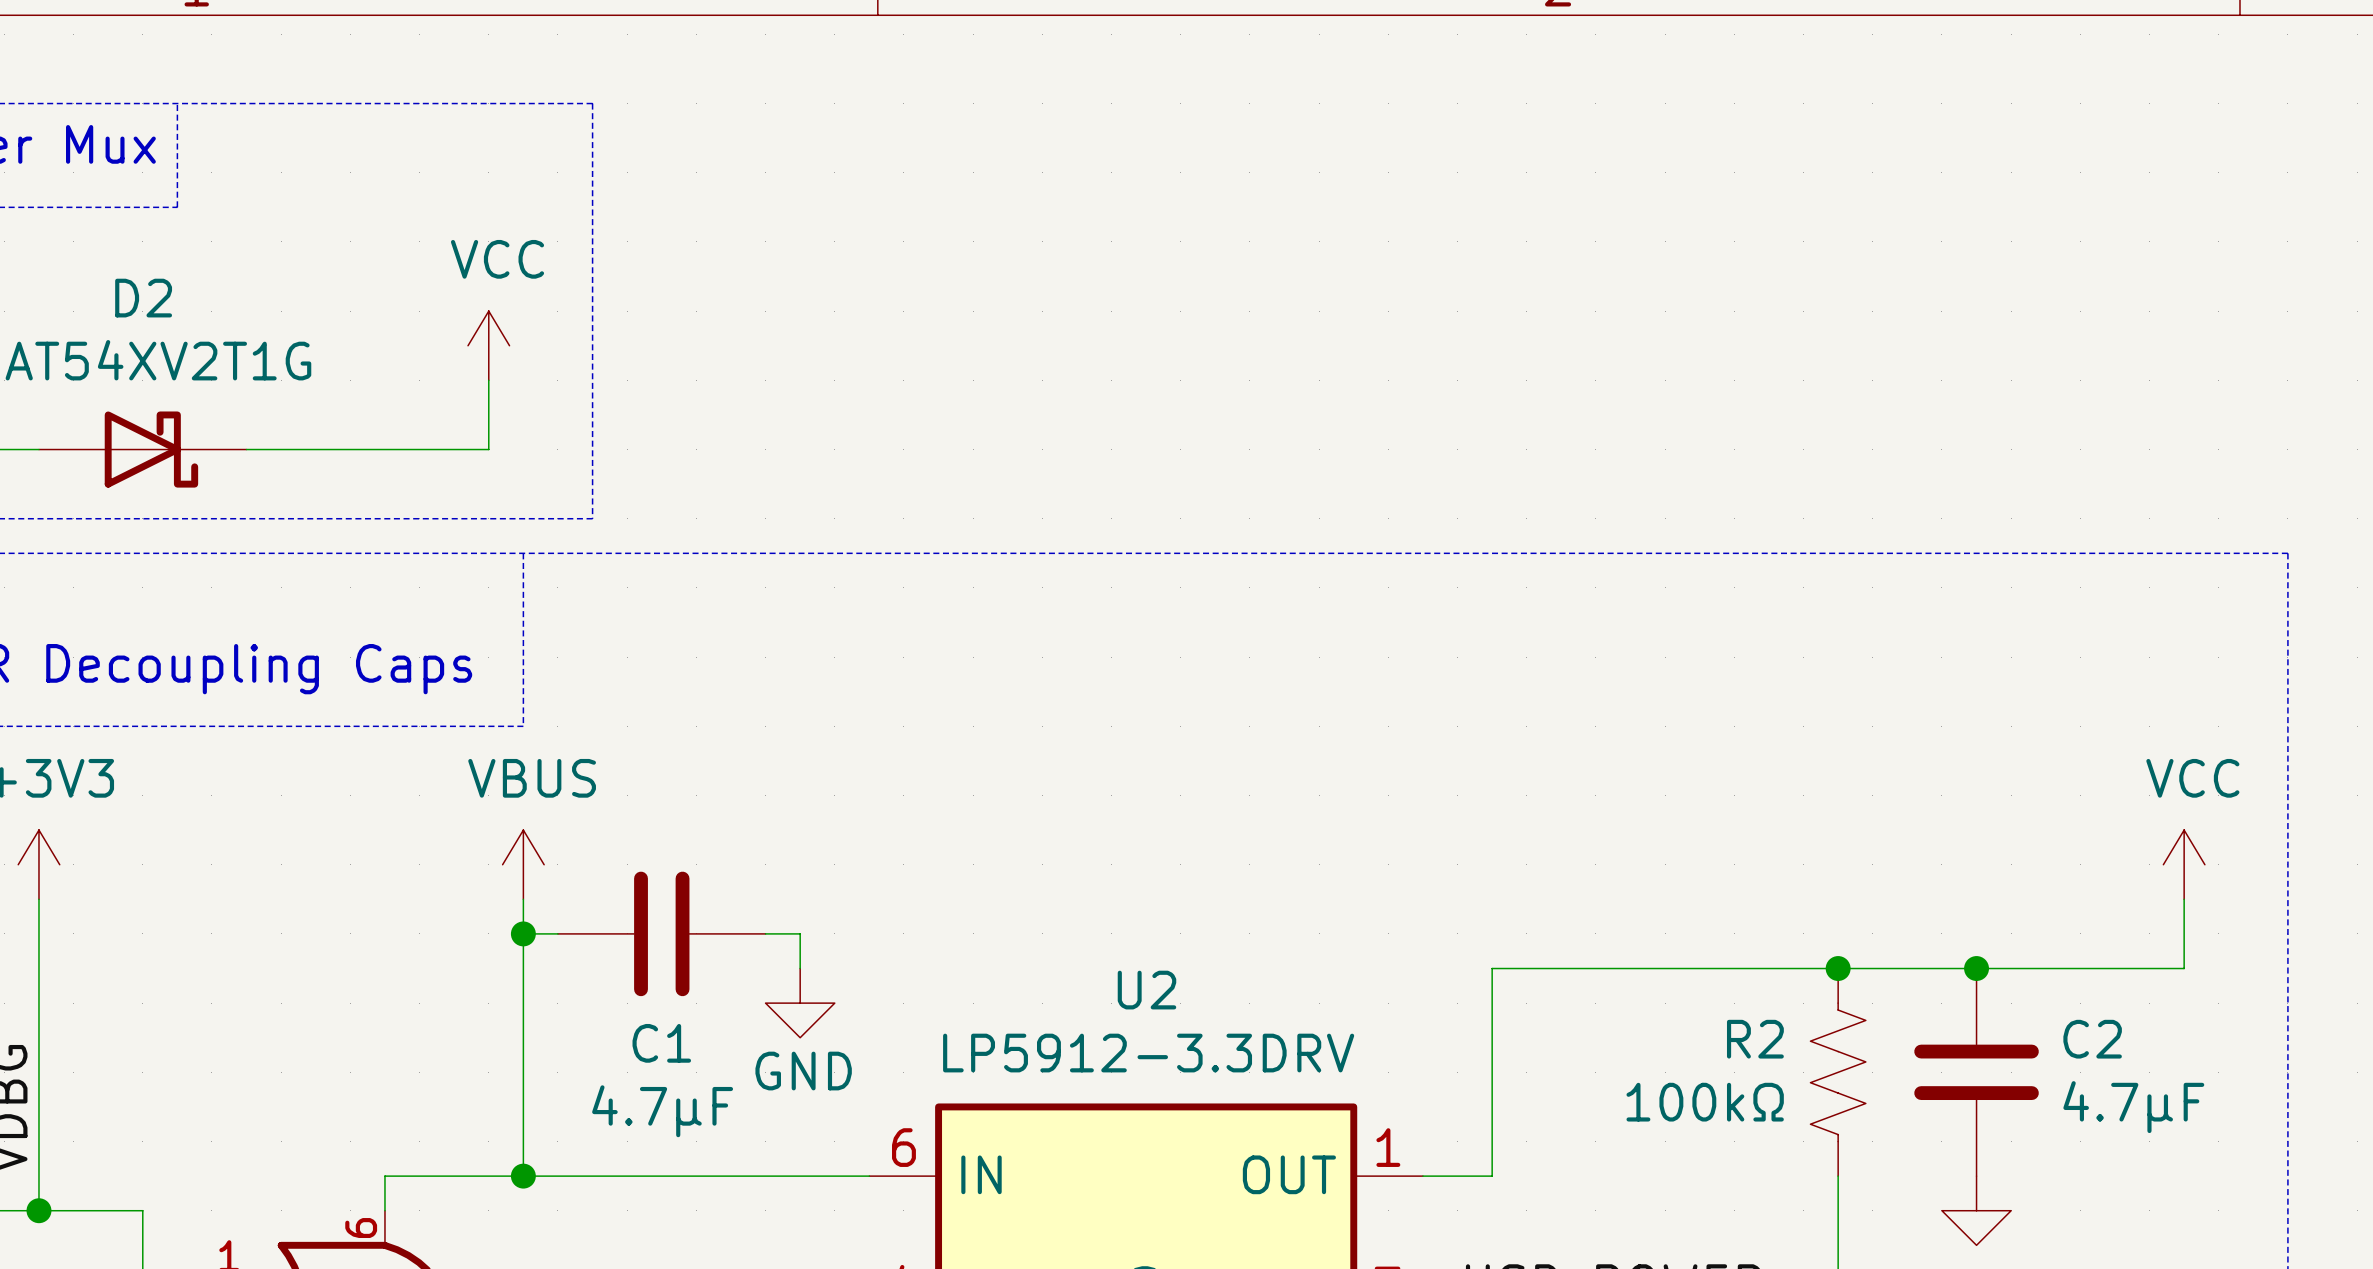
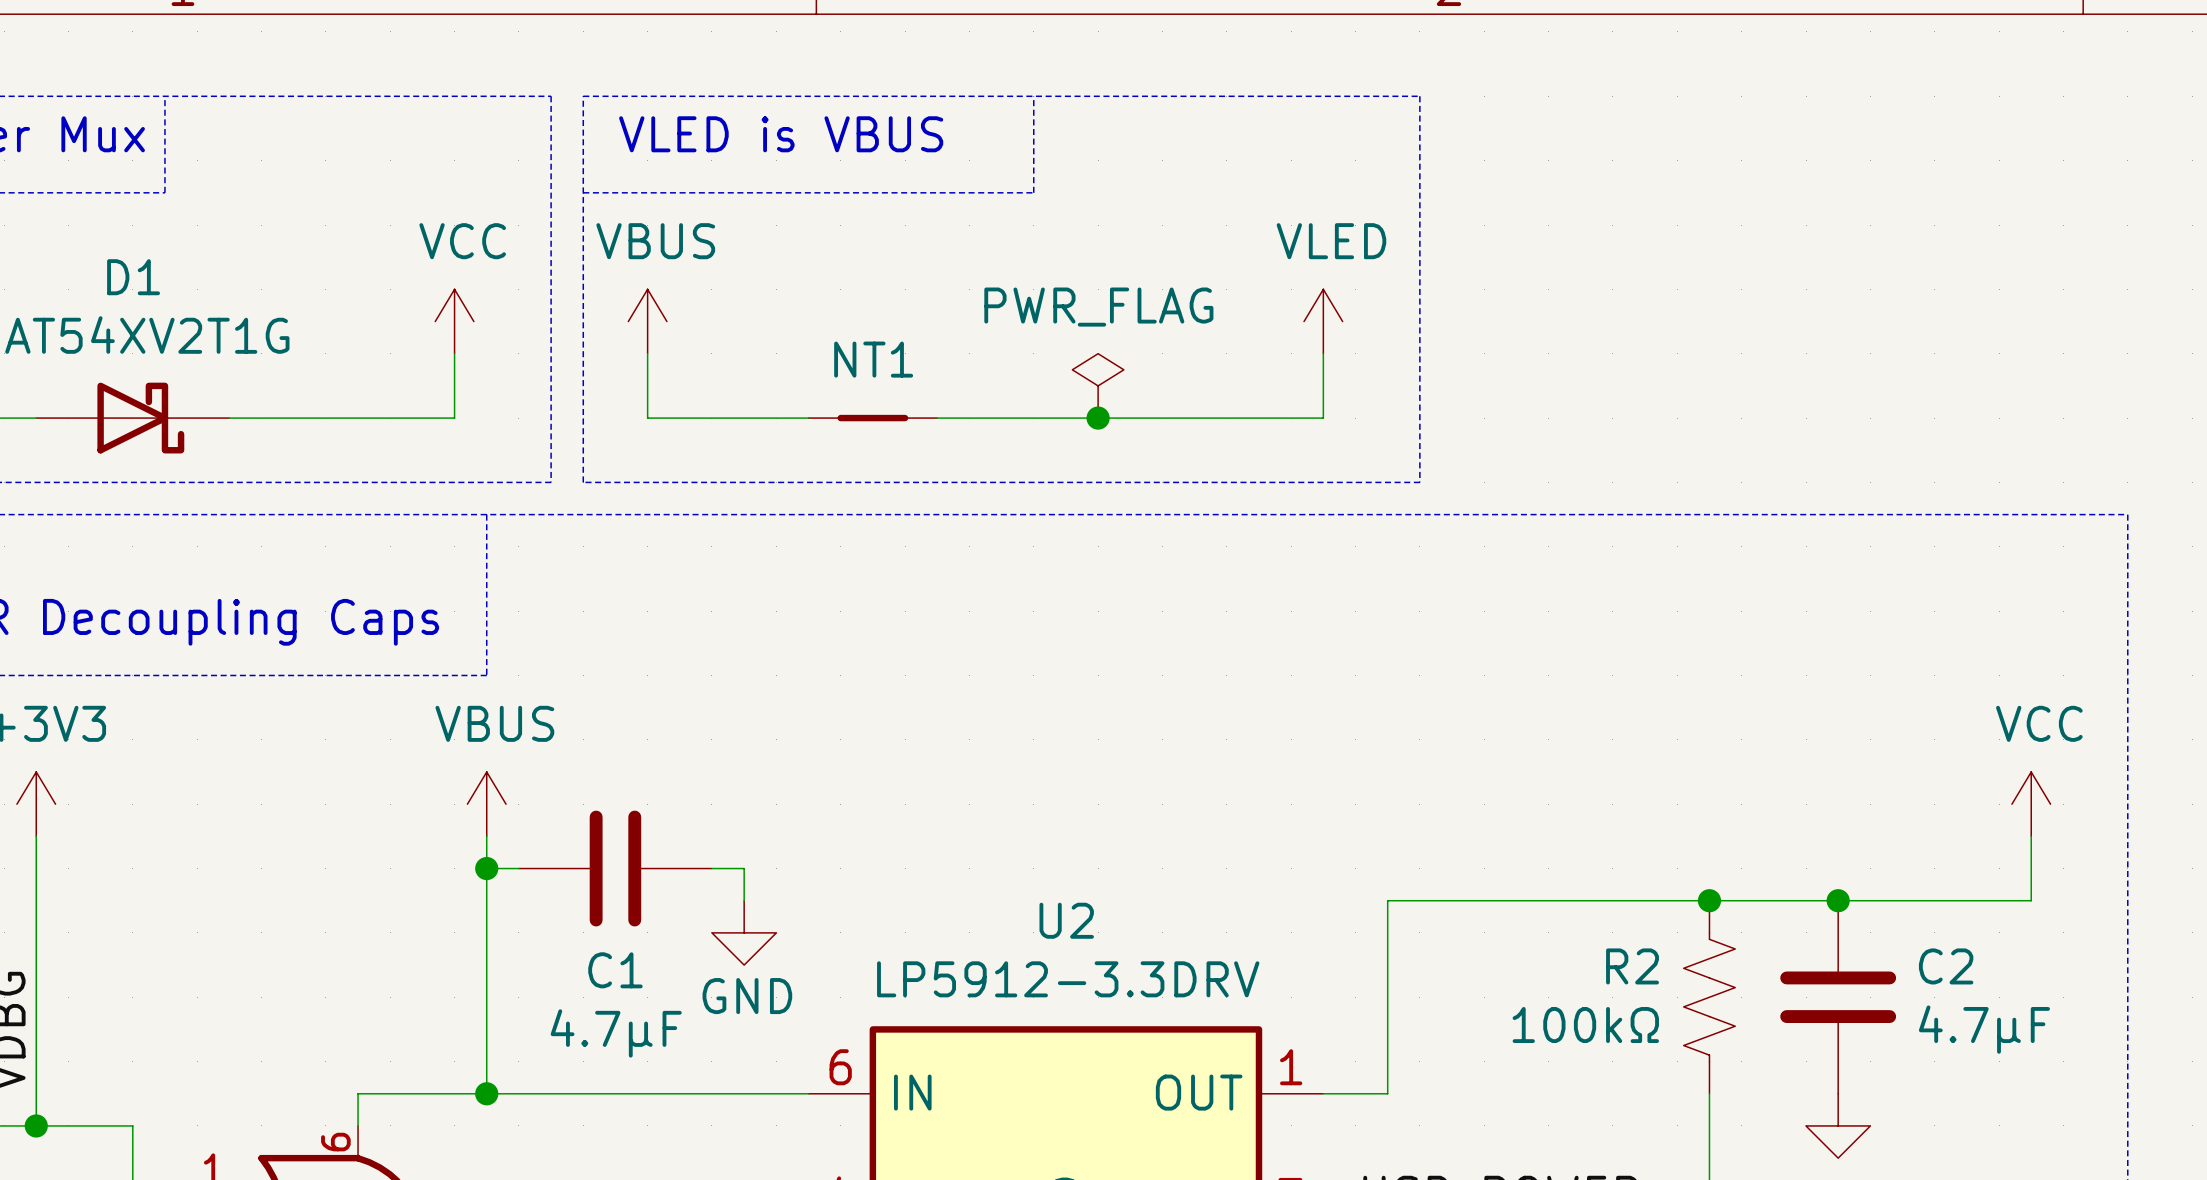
line: none -> (583, 96) (1419, 96) (1419, 482) (583, 482) (583, 96)
line: none -> (1033, 96) (1033, 192) (583, 192)
text: none -> VLED is VBUS (781, 134)
D2 name: D2 (143, 298) -> D1 (133, 277)
power symbol: none -> VBUS (647, 321)
power symbol: none -> VLED (1323, 321)
wire: none -> (647, 353) (647, 418) (808, 418)
wire: none -> (1323, 353) (1323, 418) (937, 418)
power symbol: none -> PWR_FLAG (1098, 385)
NT1: none -> (872, 418)
junction: none -> (1098, 418)

